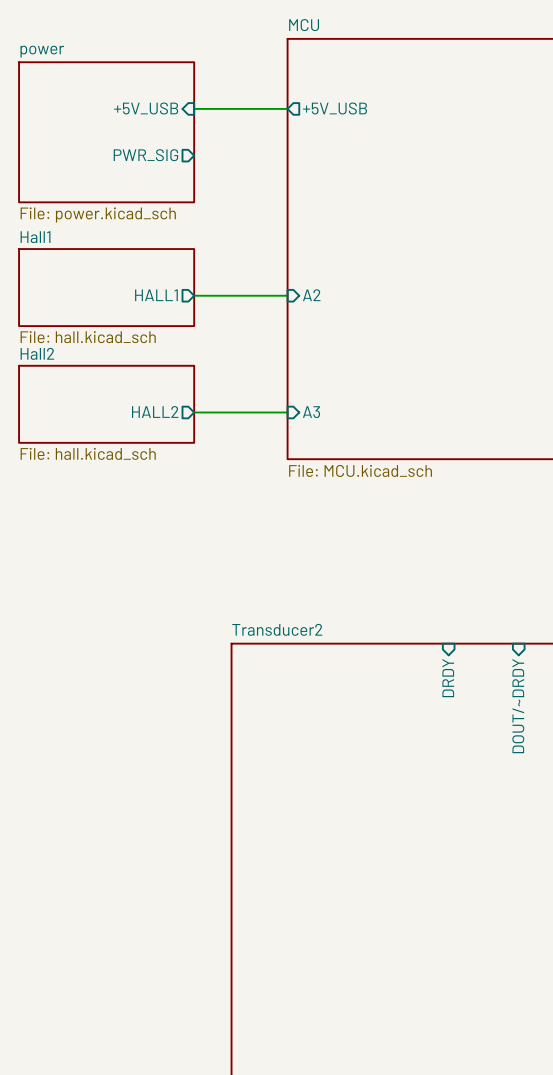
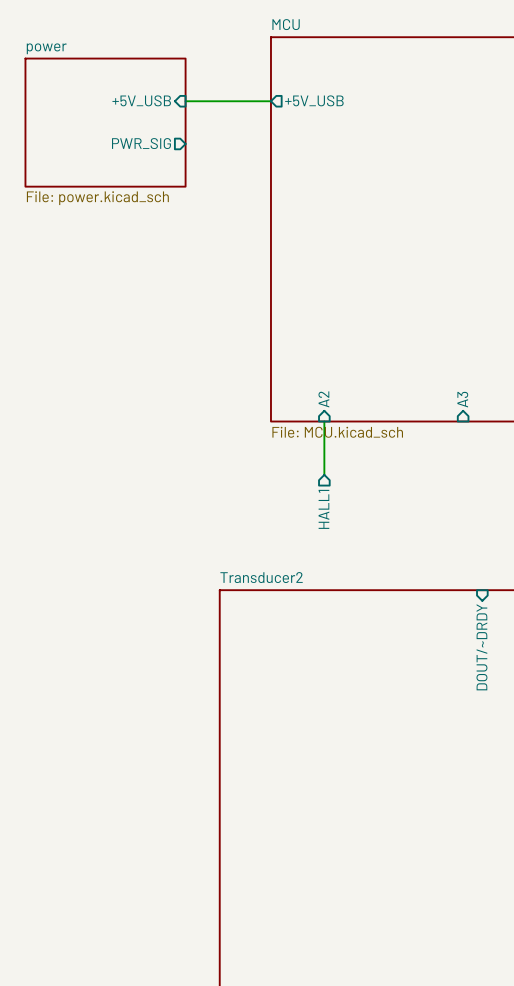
sheet Hall1: File: hall.kicad_sch (106, 287) -> none
sheet pin: HALL1 (156, 295) -> none
wire: (194, 295) (287, 295) -> none
sheet pin rotation: 0° (311, 295) -> 90° counterclockwise (323, 399)
sheet pin position: A2 (311, 295) -> A2 (323, 399)
sheet Hall2: File: hall.kicad_sch (106, 404) -> none
sheet pin: HALL2 (155, 411) -> none
wire: (194, 412) (287, 412) -> none
sheet pin rotation: 0° (311, 412) -> 90° counterclockwise (462, 399)
sheet pin position: A3 (311, 412) -> A3 (462, 399)
wire: none -> (324, 421) (324, 474)
sheet pin: none -> HALL1 (323, 509)
sheet pin: DRDY (448, 678) -> none

